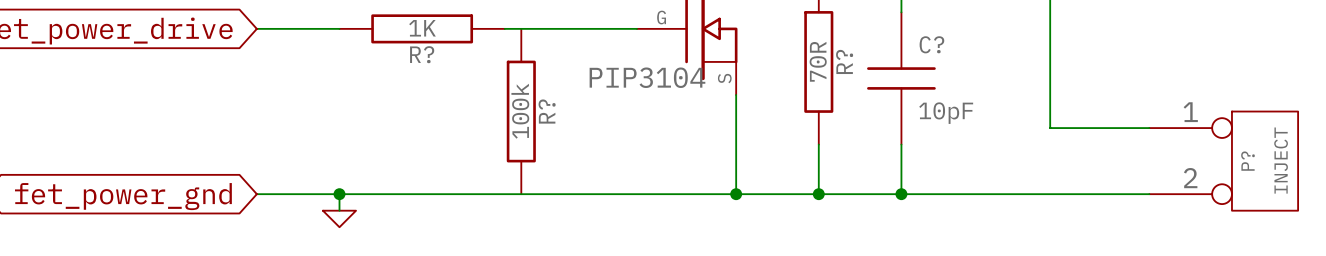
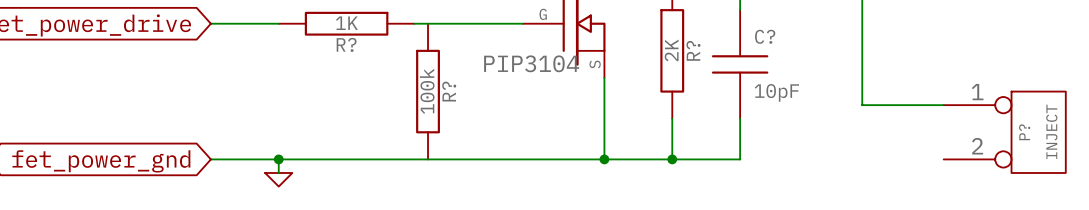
R? value: 70R (818, 61) -> 2K (671, 50)
wire: (901, 194) (1149, 194) -> none
junction: (901, 194) -> none

